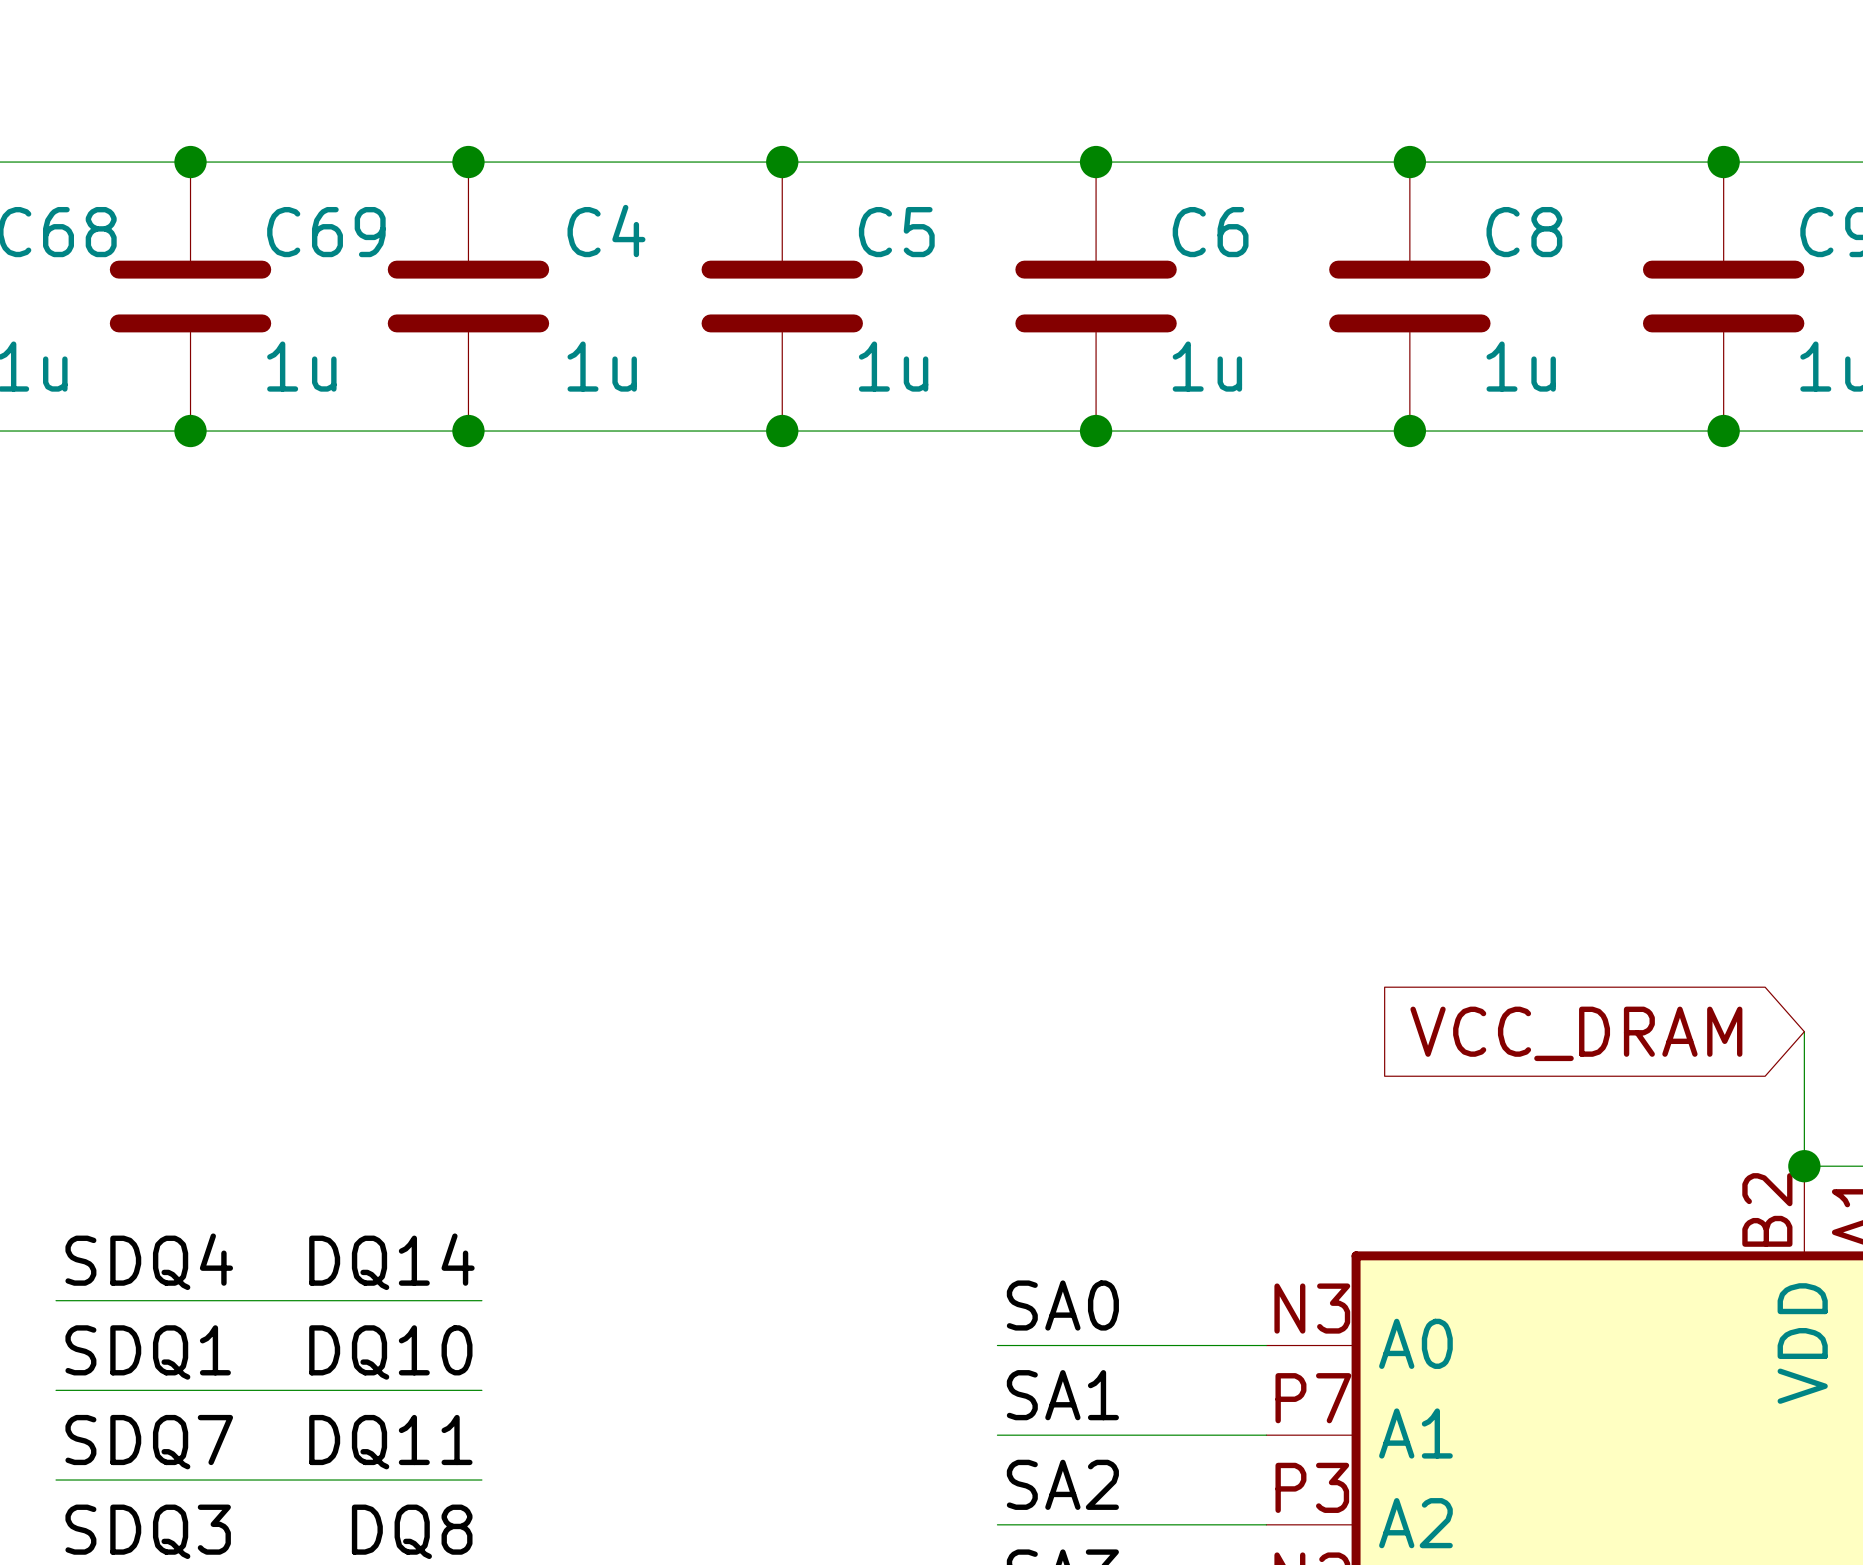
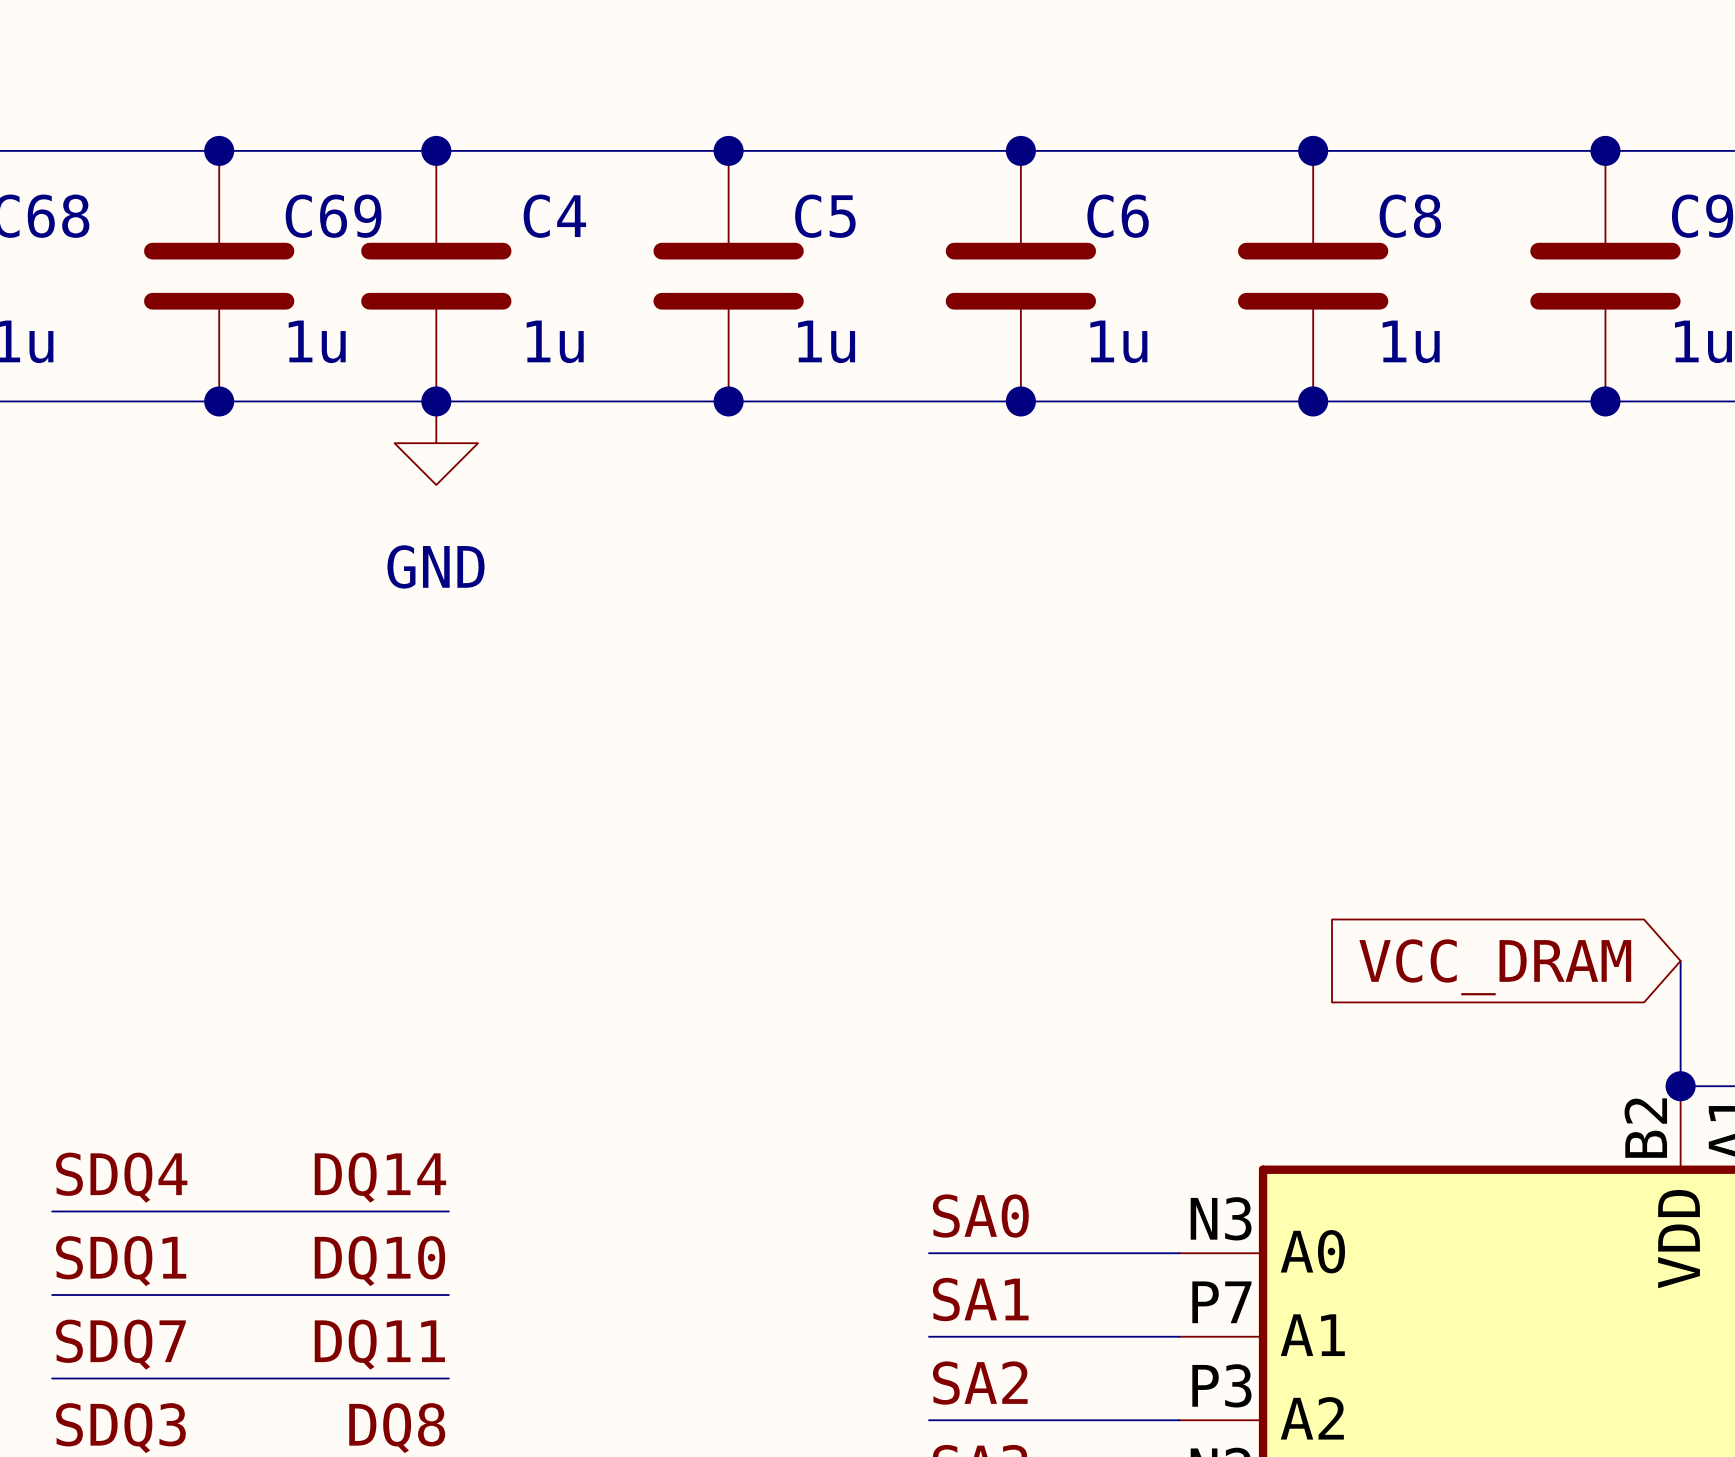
junction position: (190, 162) -> (219, 150)
C69 position: (190, 296) -> (219, 276)
junction position: (190, 431) -> (219, 401)
power symbol: none -> GND (436, 443)

